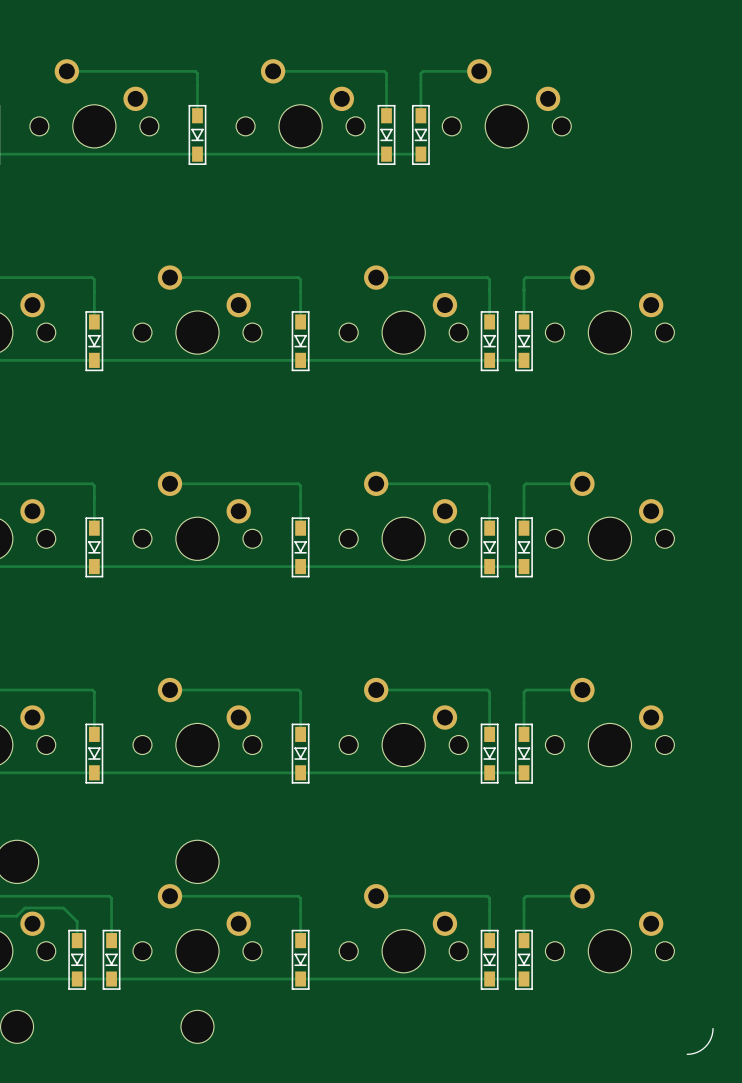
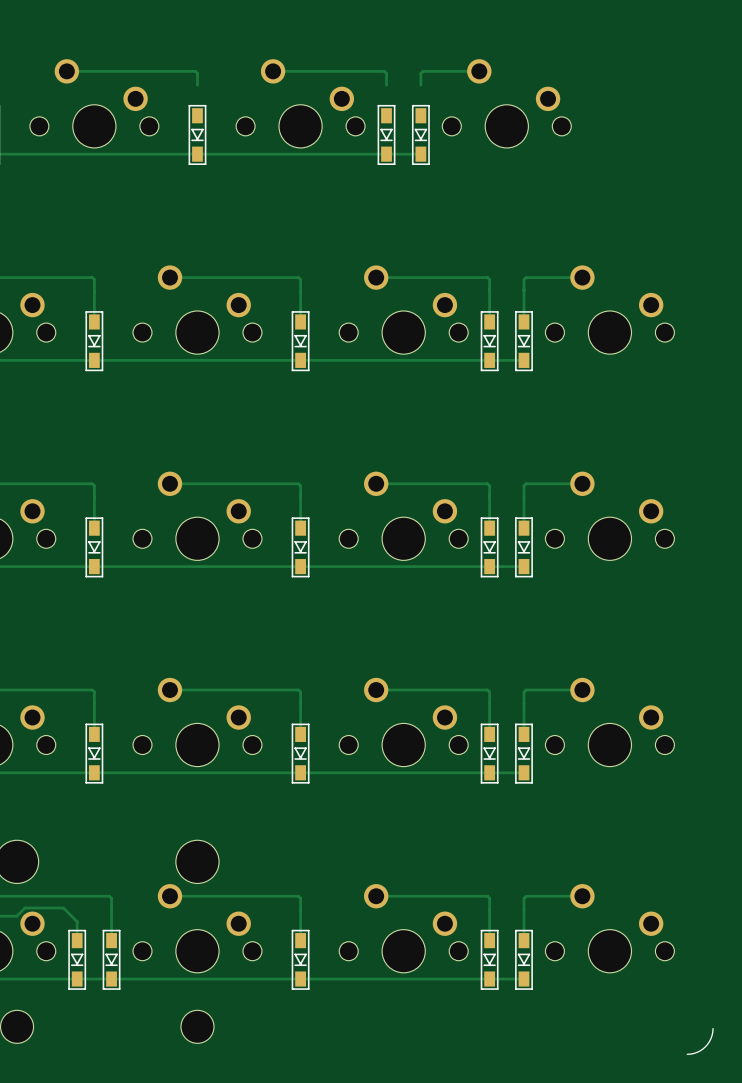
track: (197, 85) (197, 115) -> none
track: (386, 85) (386, 115) -> none
track: (420, 85) (420, 115) -> none

